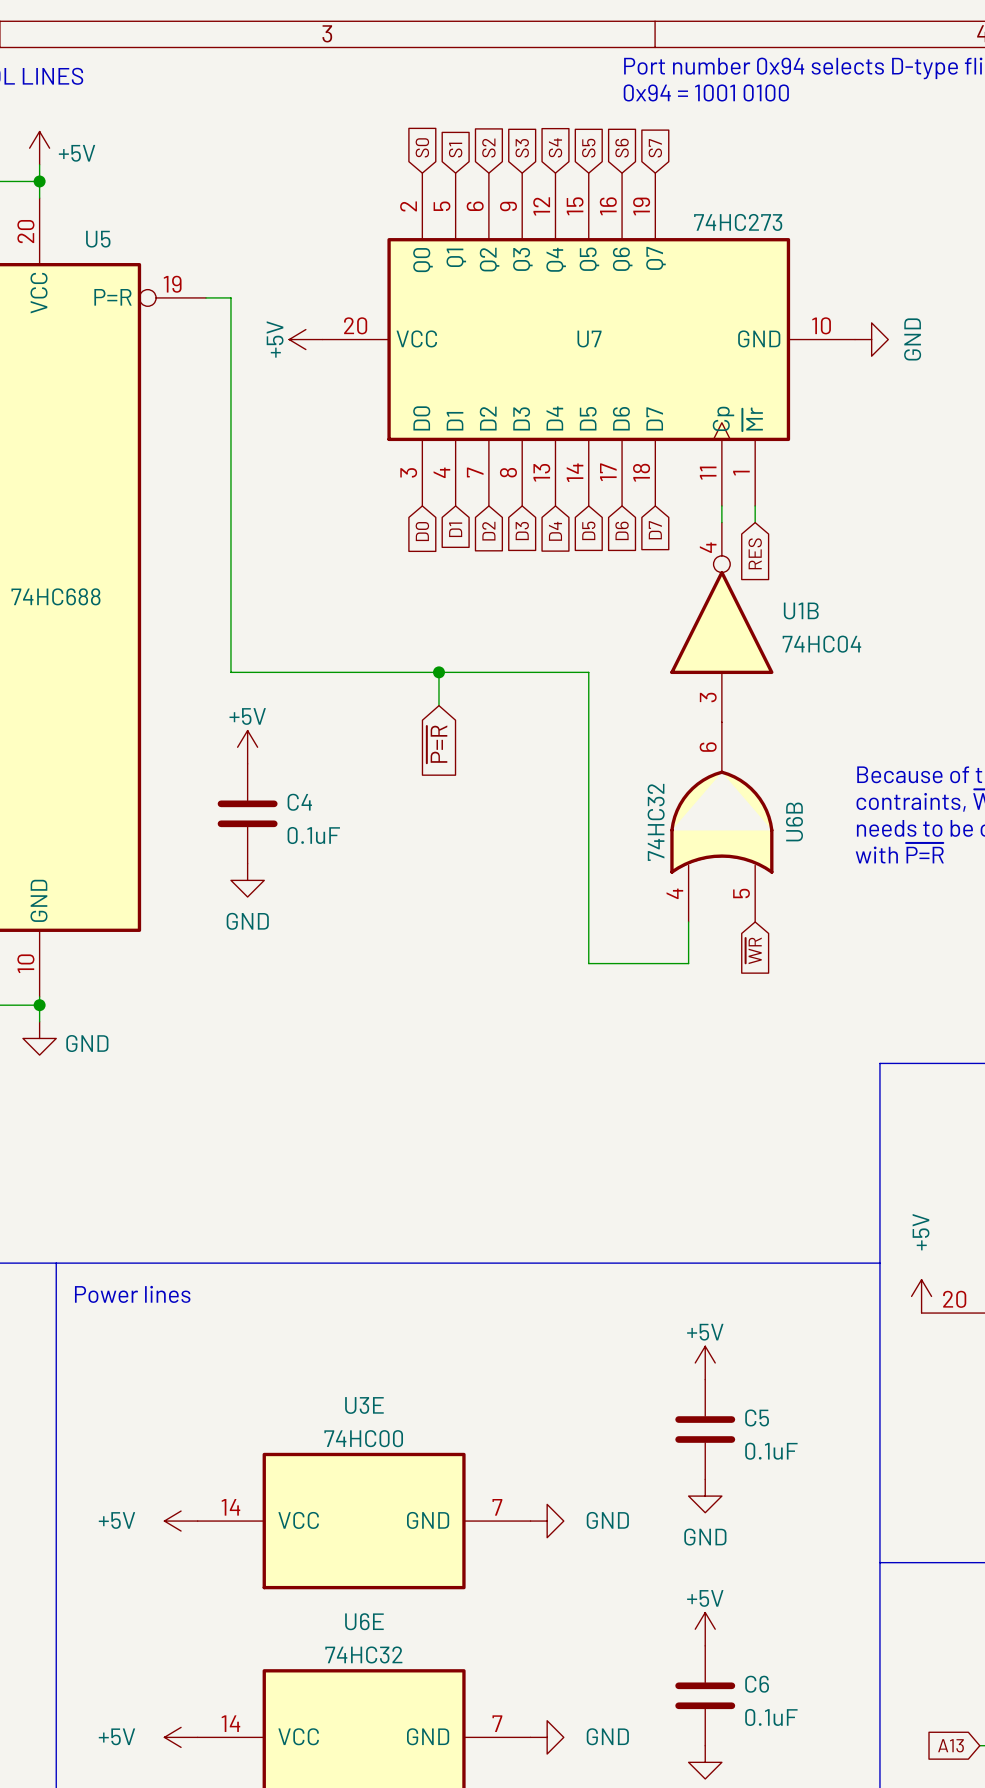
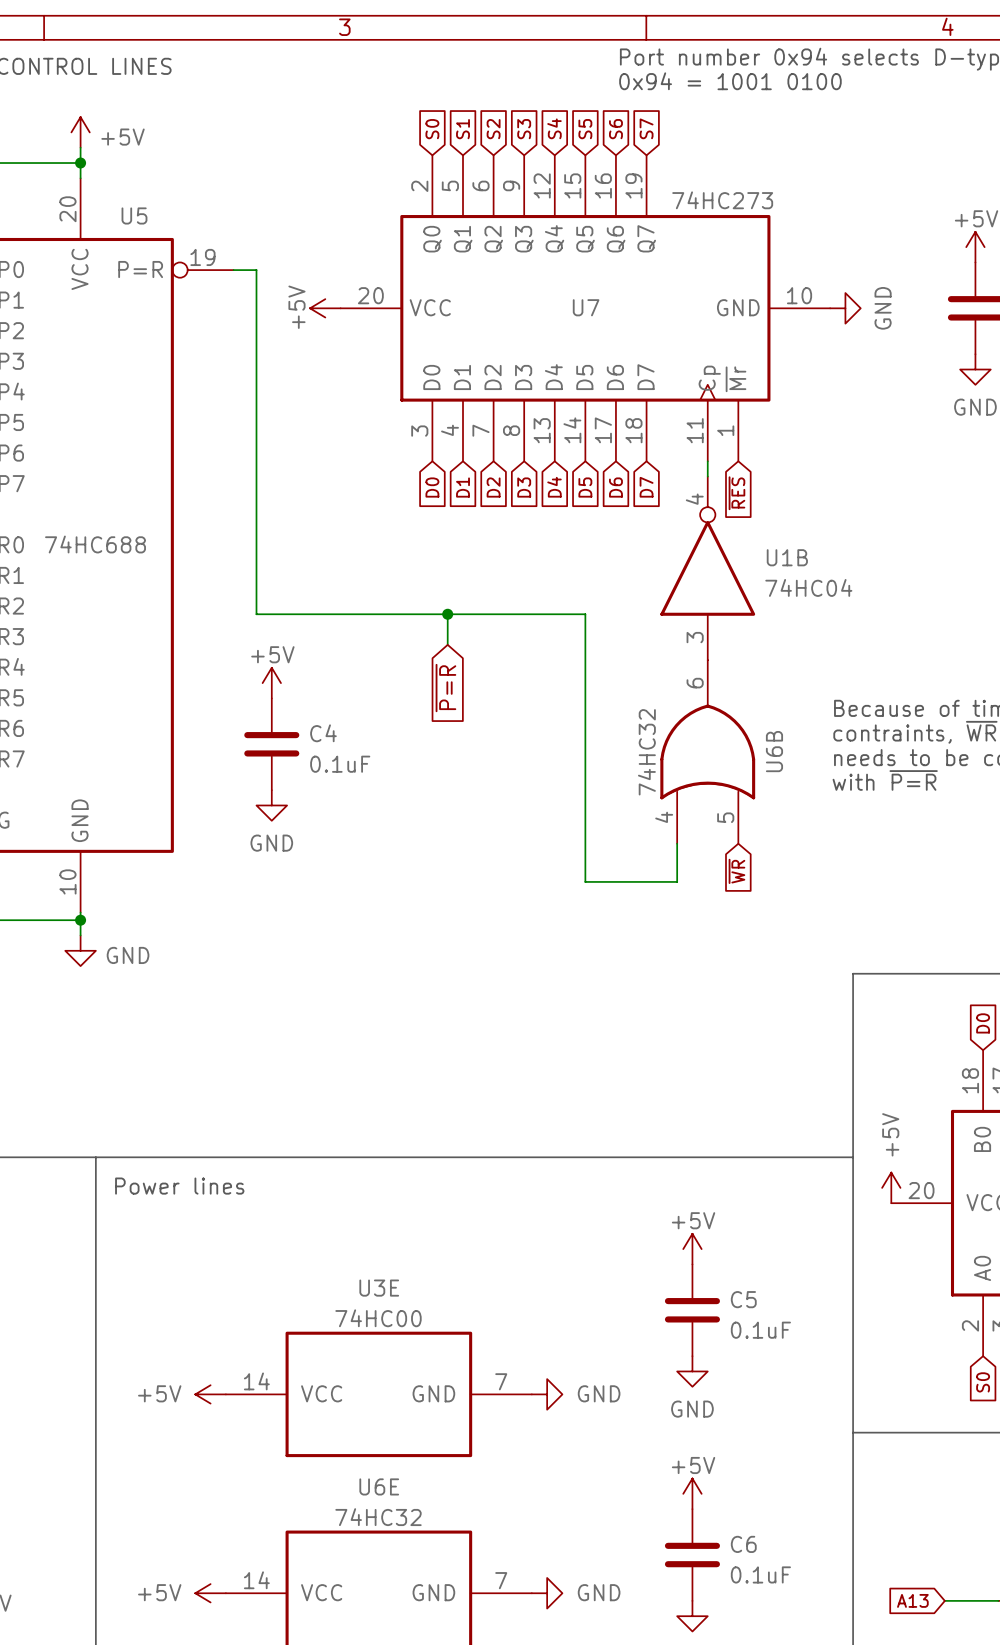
wire: (755, 505) (755, 522) -> none
global label: RES (755, 553) -> ~{RES} (736, 493)

